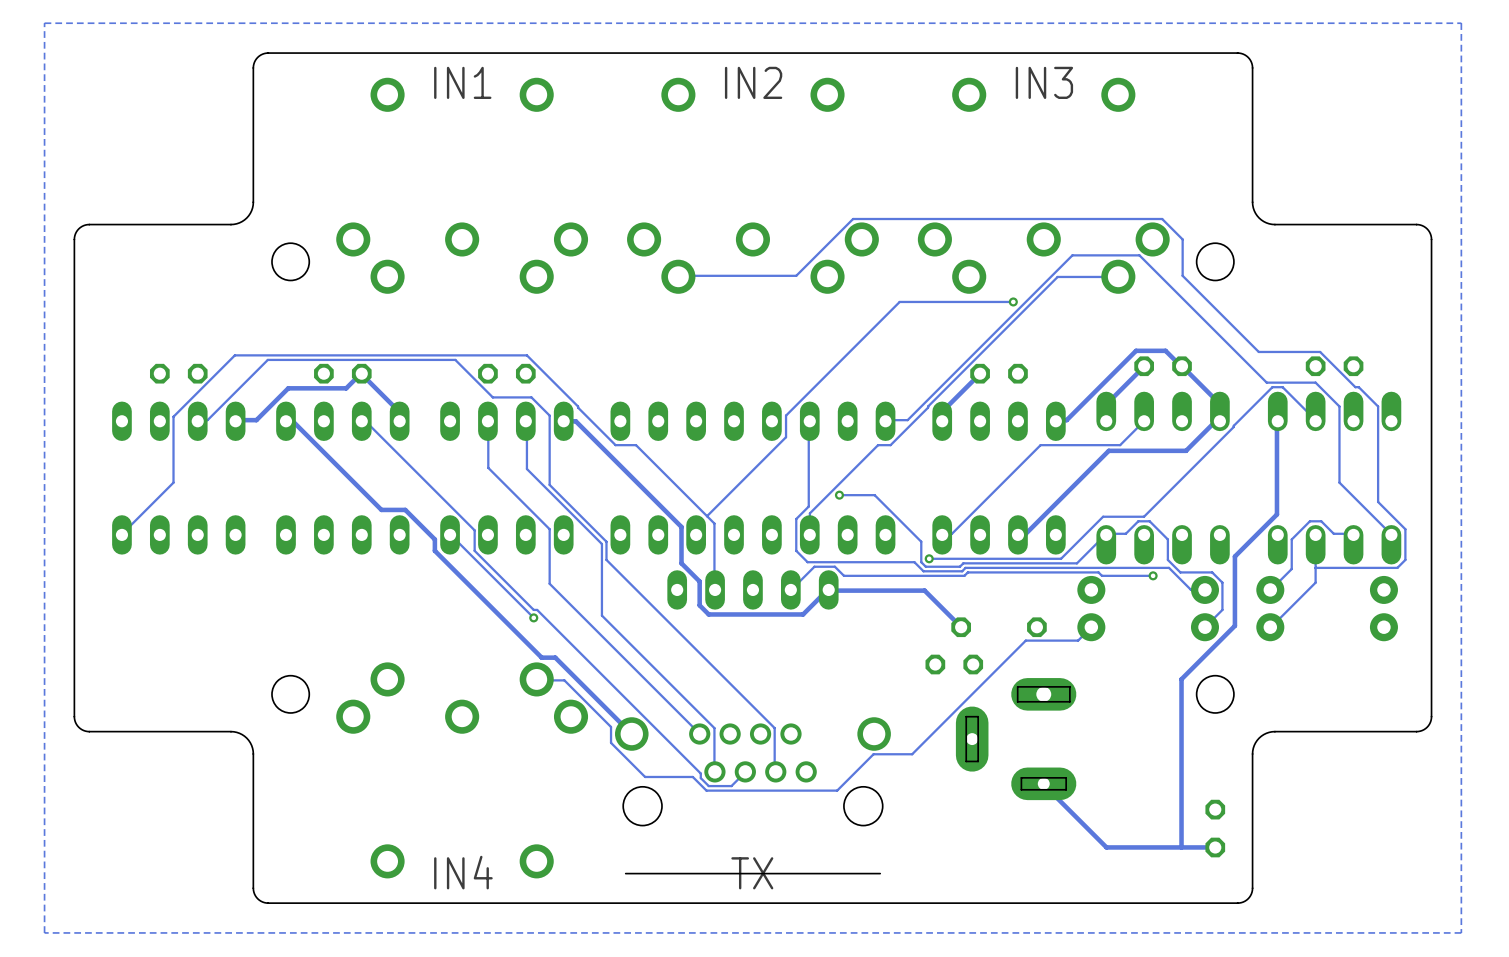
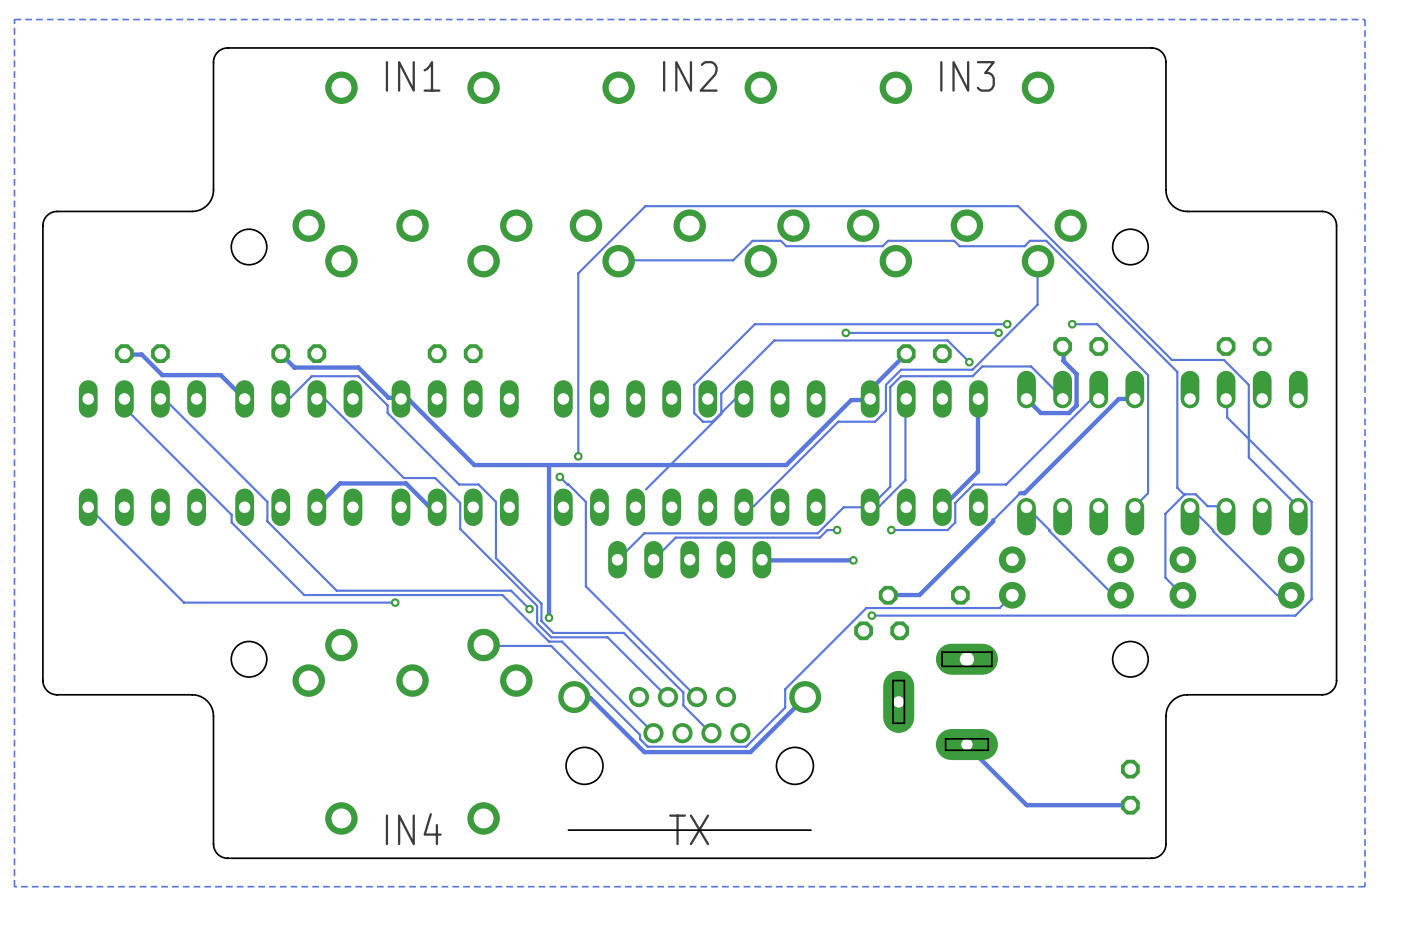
track: (853, 219) (796, 275) -> (785, 206) (645, 206) (578, 273) (578, 456)
track: (1097, 219) (1162, 219) (1182, 239) (1182, 275) (1258, 351) (1320, 351) (1355, 387) (1358, 387) (1378, 406) (1378, 501) -> none
track: (1109, 255) (1072, 255) (907, 420) (885, 421) -> (1029, 240) (1024, 246) (959, 246) (954, 240) (888, 240) (882, 246) (786, 246) (780, 240) (752, 240) (731, 260)
track: (1126, 255) (1139, 255) (1266, 382) (1315, 382) -> (1018, 206) (1171, 359) (1223, 359) (1226, 362)
track: none -> (1046, 240) (1177, 371) (1177, 487) (1184, 494)
track: (1117, 276) (1057, 276) (890, 445) (878, 445) (809, 513) (809, 533) -> (1037, 261) (1037, 304) (972, 369) (901, 369) (885, 384) (885, 410) (875, 421) (838, 421) (753, 506) (744, 506)
track: (1013, 301) (899, 301) (841, 359) -> (969, 362) (947, 340) (774, 340)
via: (1013, 301) -> none
track: none -> (1007, 324) (754, 324) (694, 384) (694, 413) (702, 421) (712, 421) (735, 398) (742, 398)
via: none -> (1007, 324)
track: none -> (1072, 324) (1097, 324) (1148, 375) (1148, 403)
via: none -> (1072, 324)
via: none -> (845, 332)
track: none -> (998, 332) (845, 332)
via: none -> (998, 332)
track: (1144, 366) (1106, 404) (1106, 421) -> (1062, 346) (1063, 361) (1076, 374) (1076, 405) (1068, 413) (1040, 413) (1026, 398)
track: none -> (124, 353) (141, 354) (162, 375) (220, 375) (244, 398)
via: none -> (969, 362)
track: (338, 388) (288, 388) (256, 420) (235, 421) -> (294, 367) (280, 353)
track: (346, 388) (361, 373) (398, 411) (399, 421) -> (302, 367) (358, 367) (388, 397) (409, 400) (474, 465) (786, 465) (851, 400) (870, 398)
track: (197, 421) (207, 420) (267, 359) (455, 359) (492, 397) (531, 397) (549, 415) (549, 484) (606, 541) (606, 559) (774, 728) (774, 771) -> (160, 398) (164, 398) (267, 501) (267, 521) (336, 590) (511, 590) (529, 609)
track: (286, 421) (292, 421) (381, 509) (386, 509) -> (316, 507) (339, 483)
track: (365, 421) (474, 530) (474, 550) (607, 680) -> (320, 398) (324, 398) (403, 478) (435, 478) (460, 502) (460, 528) (537, 605) (537, 623) (551, 637) (607, 637) (667, 697)
track: (487, 421) (488, 467) (531, 511) -> (280, 398) (290, 397) (311, 376) (358, 376) (387, 405) (387, 413) (459, 484) (478, 484)
track: (525, 421) (526, 469) (601, 544) (601, 615) (714, 728) (714, 771) -> (124, 398) (124, 407) (231, 514) (231, 522) (304, 595) (502, 595) (549, 641) (562, 641) (653, 732)
track: (563, 421) (575, 421) (681, 526) (681, 563) (699, 581) (699, 605) (708, 614) (803, 614) (828, 589) -> none
track: (808, 421) (808, 506) (796, 519) (796, 550) (807, 562) -> (617, 559) (644, 533) (741, 533)
track: none -> (906, 398) (905, 480)
track: (1055, 421) (1066, 420) (1136, 350) (1165, 350) (1219, 403) (1219, 421) (1216, 420) (1186, 450) (1108, 450) (1025, 533) (1019, 533) -> (978, 398) (977, 471) (943, 506)
track: (1144, 421) (1120, 445) (1040, 445) (979, 506) -> (1062, 398) (1031, 366) (982, 366) (972, 376) (901, 376) (890, 387) (890, 486) (870, 506)
track: none -> (1098, 398) (1091, 398) (1006, 484) (973, 484) (955, 502) (955, 522) (947, 530)
track: (1277, 421) (1276, 514) (1234, 556) (1234, 625) (1181, 679) (1181, 847) -> none
track: (1315, 421) (1282, 387) (1272, 387) (1233, 425) -> (1226, 398) (1227, 417) (1285, 475)
track: (1233, 426) (1144, 516) (1103, 516) (1099, 520) -> (1134, 398) (1118, 398) (1024, 493) (1020, 493)
track: none -> (1148, 404) (1148, 493) (1134, 507)
via: none -> (578, 456)
track: none -> (549, 465) (549, 617)
track: (839, 495) (874, 495) (921, 541) (921, 562) (925, 566) (959, 566) (963, 563) (1076, 563) (1106, 533) (1125, 533) (1138, 521) (1149, 521) (1167, 539) (1167, 559) (1180, 572) (1212, 572) (1222, 582) (1222, 609) (1204, 627) -> (1026, 507) (1113, 595) (1120, 595)
via: (839, 495) -> none
track: none -> (559, 476) (585, 501) (585, 586) (696, 697)
via: none -> (559, 476)
track: (405, 509) (434, 539) (434, 550) (541, 657) (555, 657) (631, 734) -> (358, 483) (406, 483) (428, 506) (437, 507)
track: (121, 534) (173, 482) (173, 416) (234, 355) (526, 355) (615, 445) (636, 445) (714, 523) (715, 589) -> (88, 507) (183, 602) (395, 602)
track: (450, 534) (533, 617) -> none
track: none -> (1189, 507) (1276, 595) (1291, 595)
track: (1315, 534) (1315, 582) (1270, 627) -> (1226, 507) (1207, 506) (1195, 494) (1184, 494) (1165, 513) (1165, 577) (1182, 595)
track: (1353, 534) (1333, 533) (1321, 521) (1309, 521) (1291, 539) (1291, 569) (1270, 589) -> none
track: (1071, 548) (1061, 558) (1023, 558) -> (993, 520) (919, 595) (888, 595)
via: none -> (837, 530)
via: (929, 558) -> none
track: (964, 558) (929, 558) -> none
via: none -> (891, 530)
track: (1405, 559) (1397, 567) (1315, 567) -> (1311, 531) (1311, 599) (1295, 615) (871, 615)
track: (887, 562) (914, 562) (923, 571) (962, 571) (965, 567) (1169, 567) (1190, 589) (1204, 589) -> (817, 533) (843, 507) (870, 507)
track: (814, 566) (790, 589) -> (748, 537) (675, 537) (653, 559)
track: (834, 566) (844, 575) (964, 575) (967, 572) (1098, 572) (1101, 575) (1153, 575) -> (767, 537) (819, 537) (827, 530) (837, 530)
via: (1153, 575) -> none
track: (549, 583) (699, 733) -> (495, 553) (495, 558) (541, 603) (541, 621) (553, 632) (623, 632) (683, 692) (683, 705) (710, 732)
track: (924, 590) (961, 626) -> none
via: none -> (853, 560)
via: (533, 617) -> none
via: none -> (395, 602)
track: (1025, 640) (912, 754) (873, 754) (837, 790) (706, 790) (692, 776) (645, 776) (611, 742) (611, 726) (564, 680) -> (949, 608) (866, 608) (785, 689) (785, 707) (746, 746) (669, 746)
via: none -> (529, 609)
via: none -> (871, 615)
via: none -> (549, 617)
track: none -> (551, 645) (510, 645)
track: none -> (805, 697) (750, 752) (644, 752) (590, 697) (574, 697)
track: (745, 771) (731, 786) -> none

